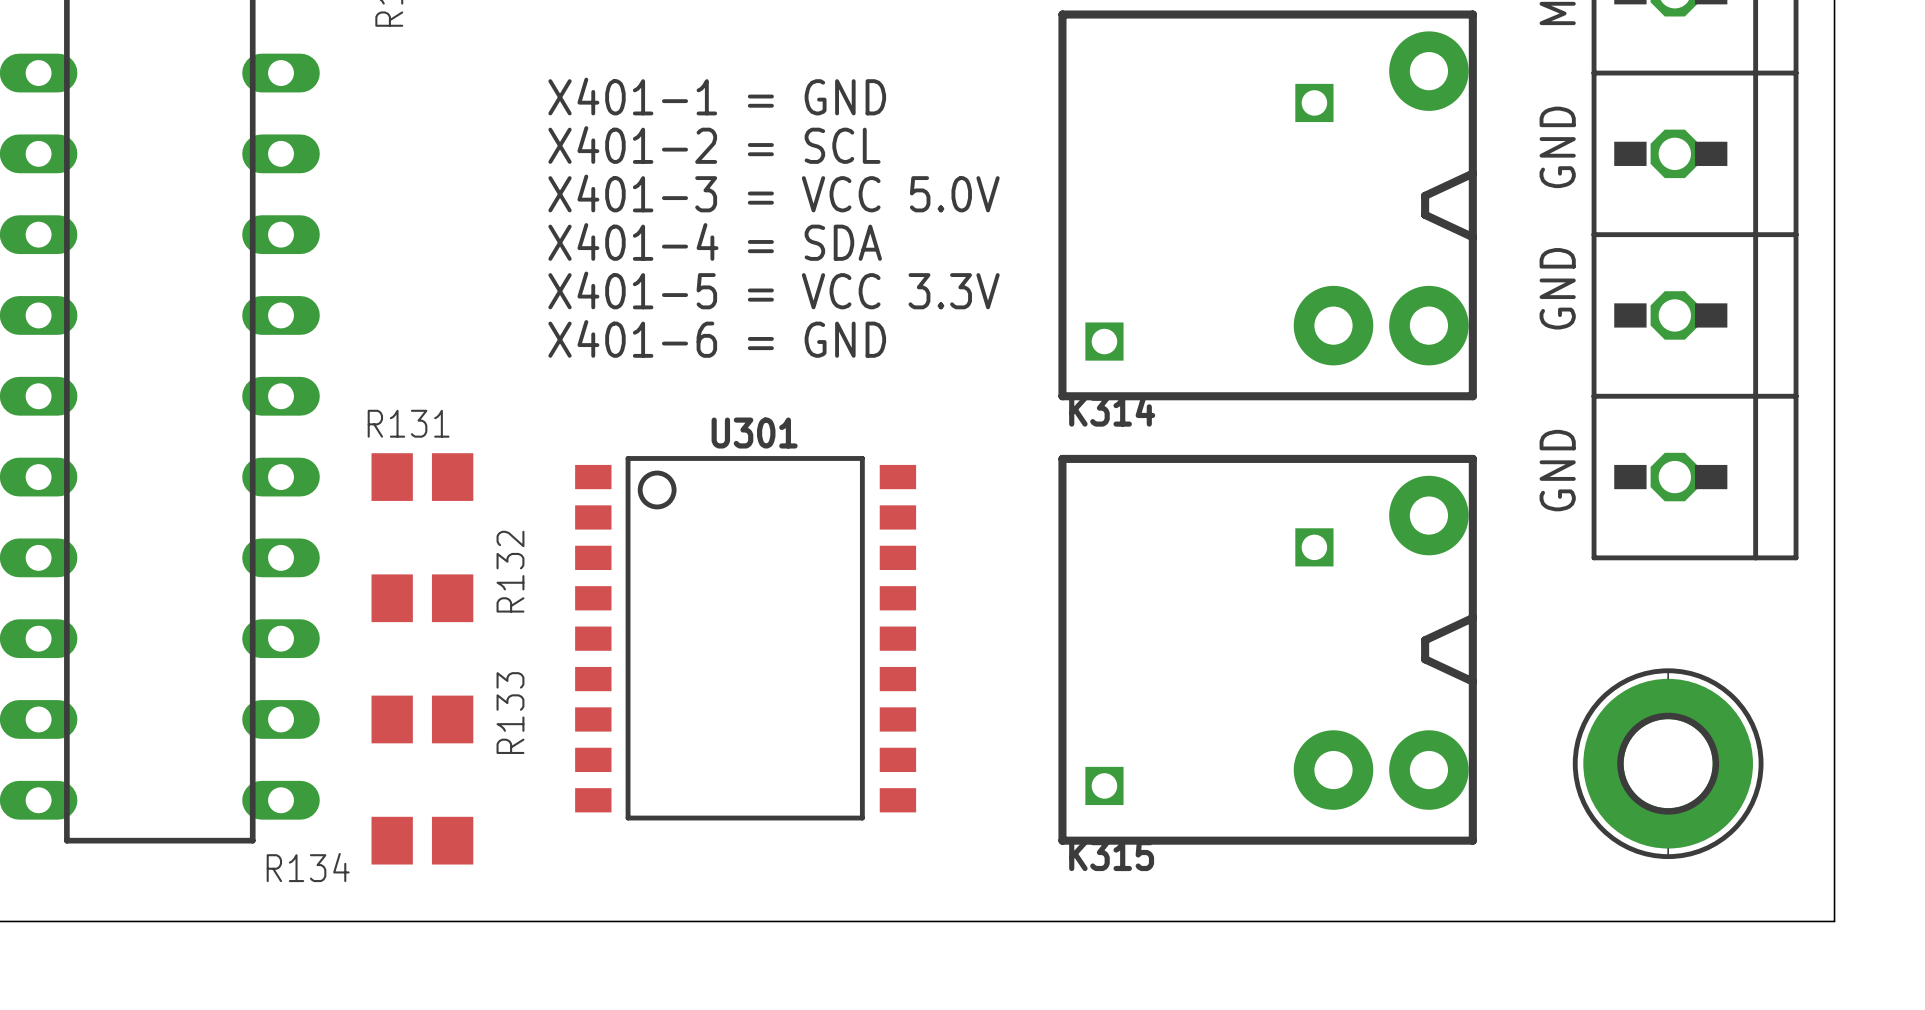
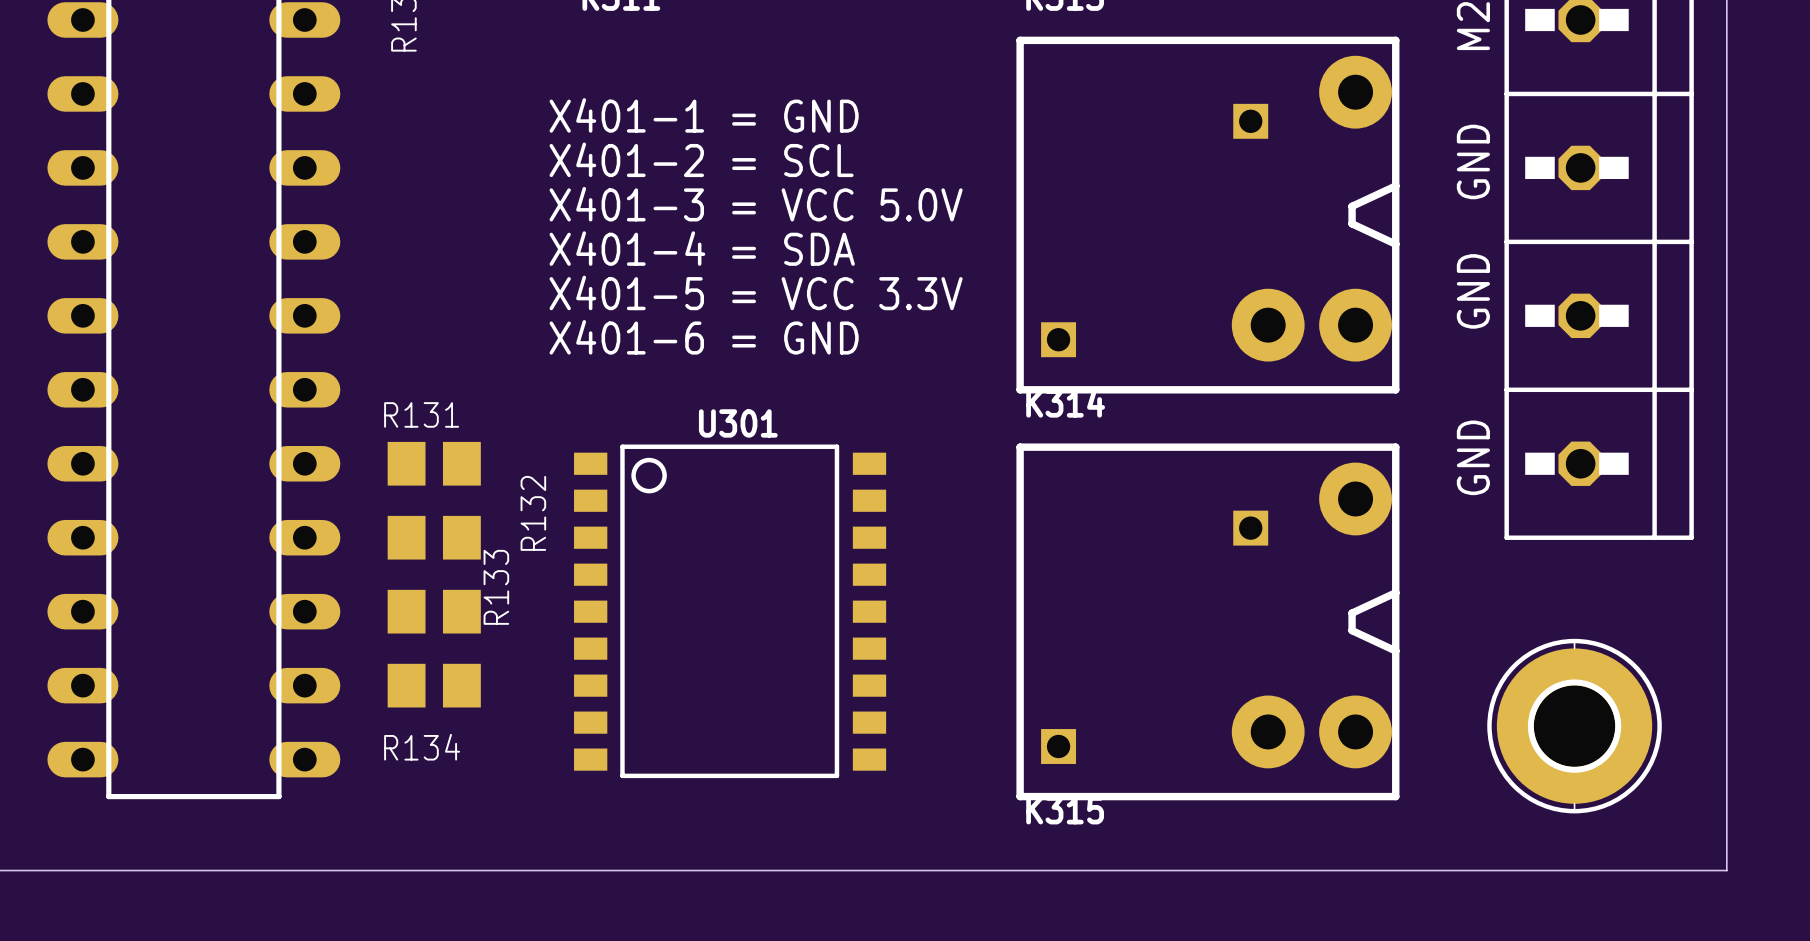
R132 name position: R132 (510, 571) -> R132 (533, 513)
R132 position: (422, 598) -> (434, 537)
R133: none -> (434, 611)
R133 name: R133 (510, 713) -> R134 (422, 747)
R134: (422, 840) -> none

